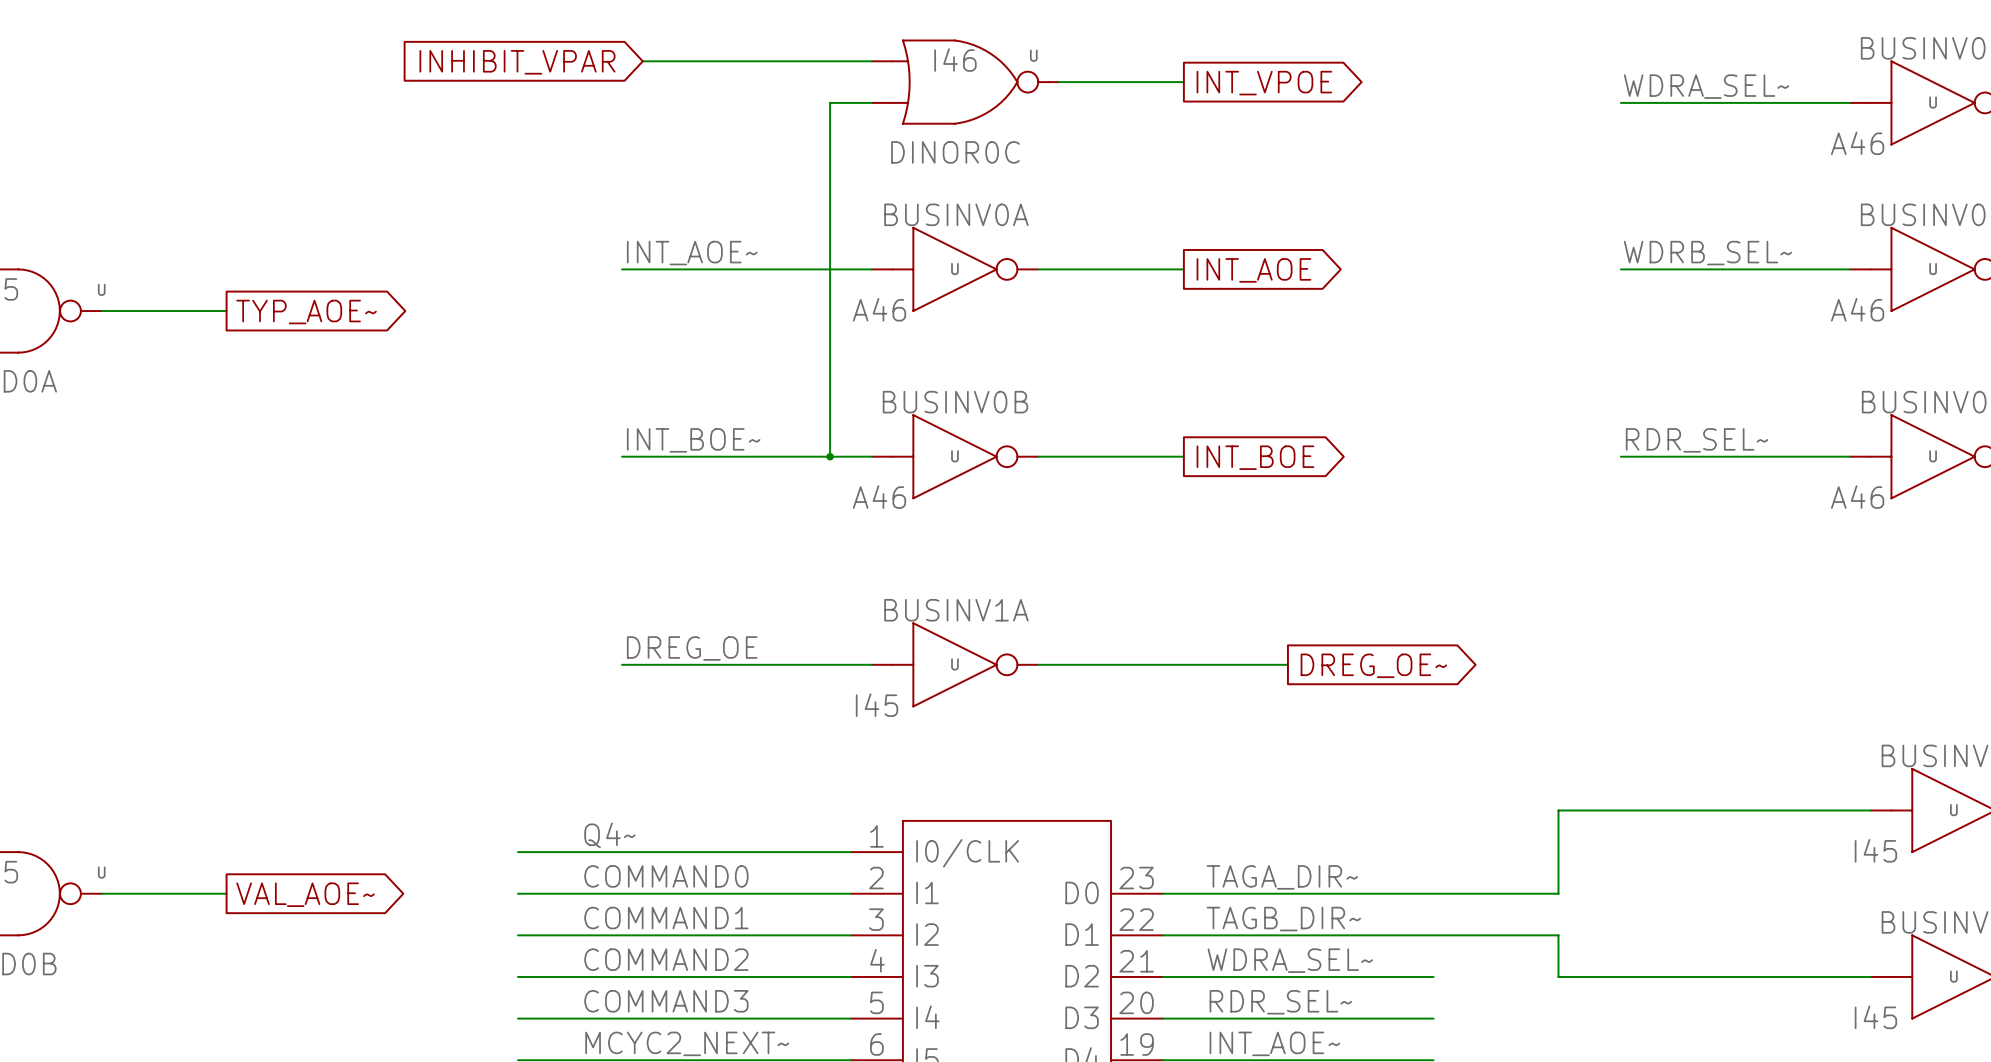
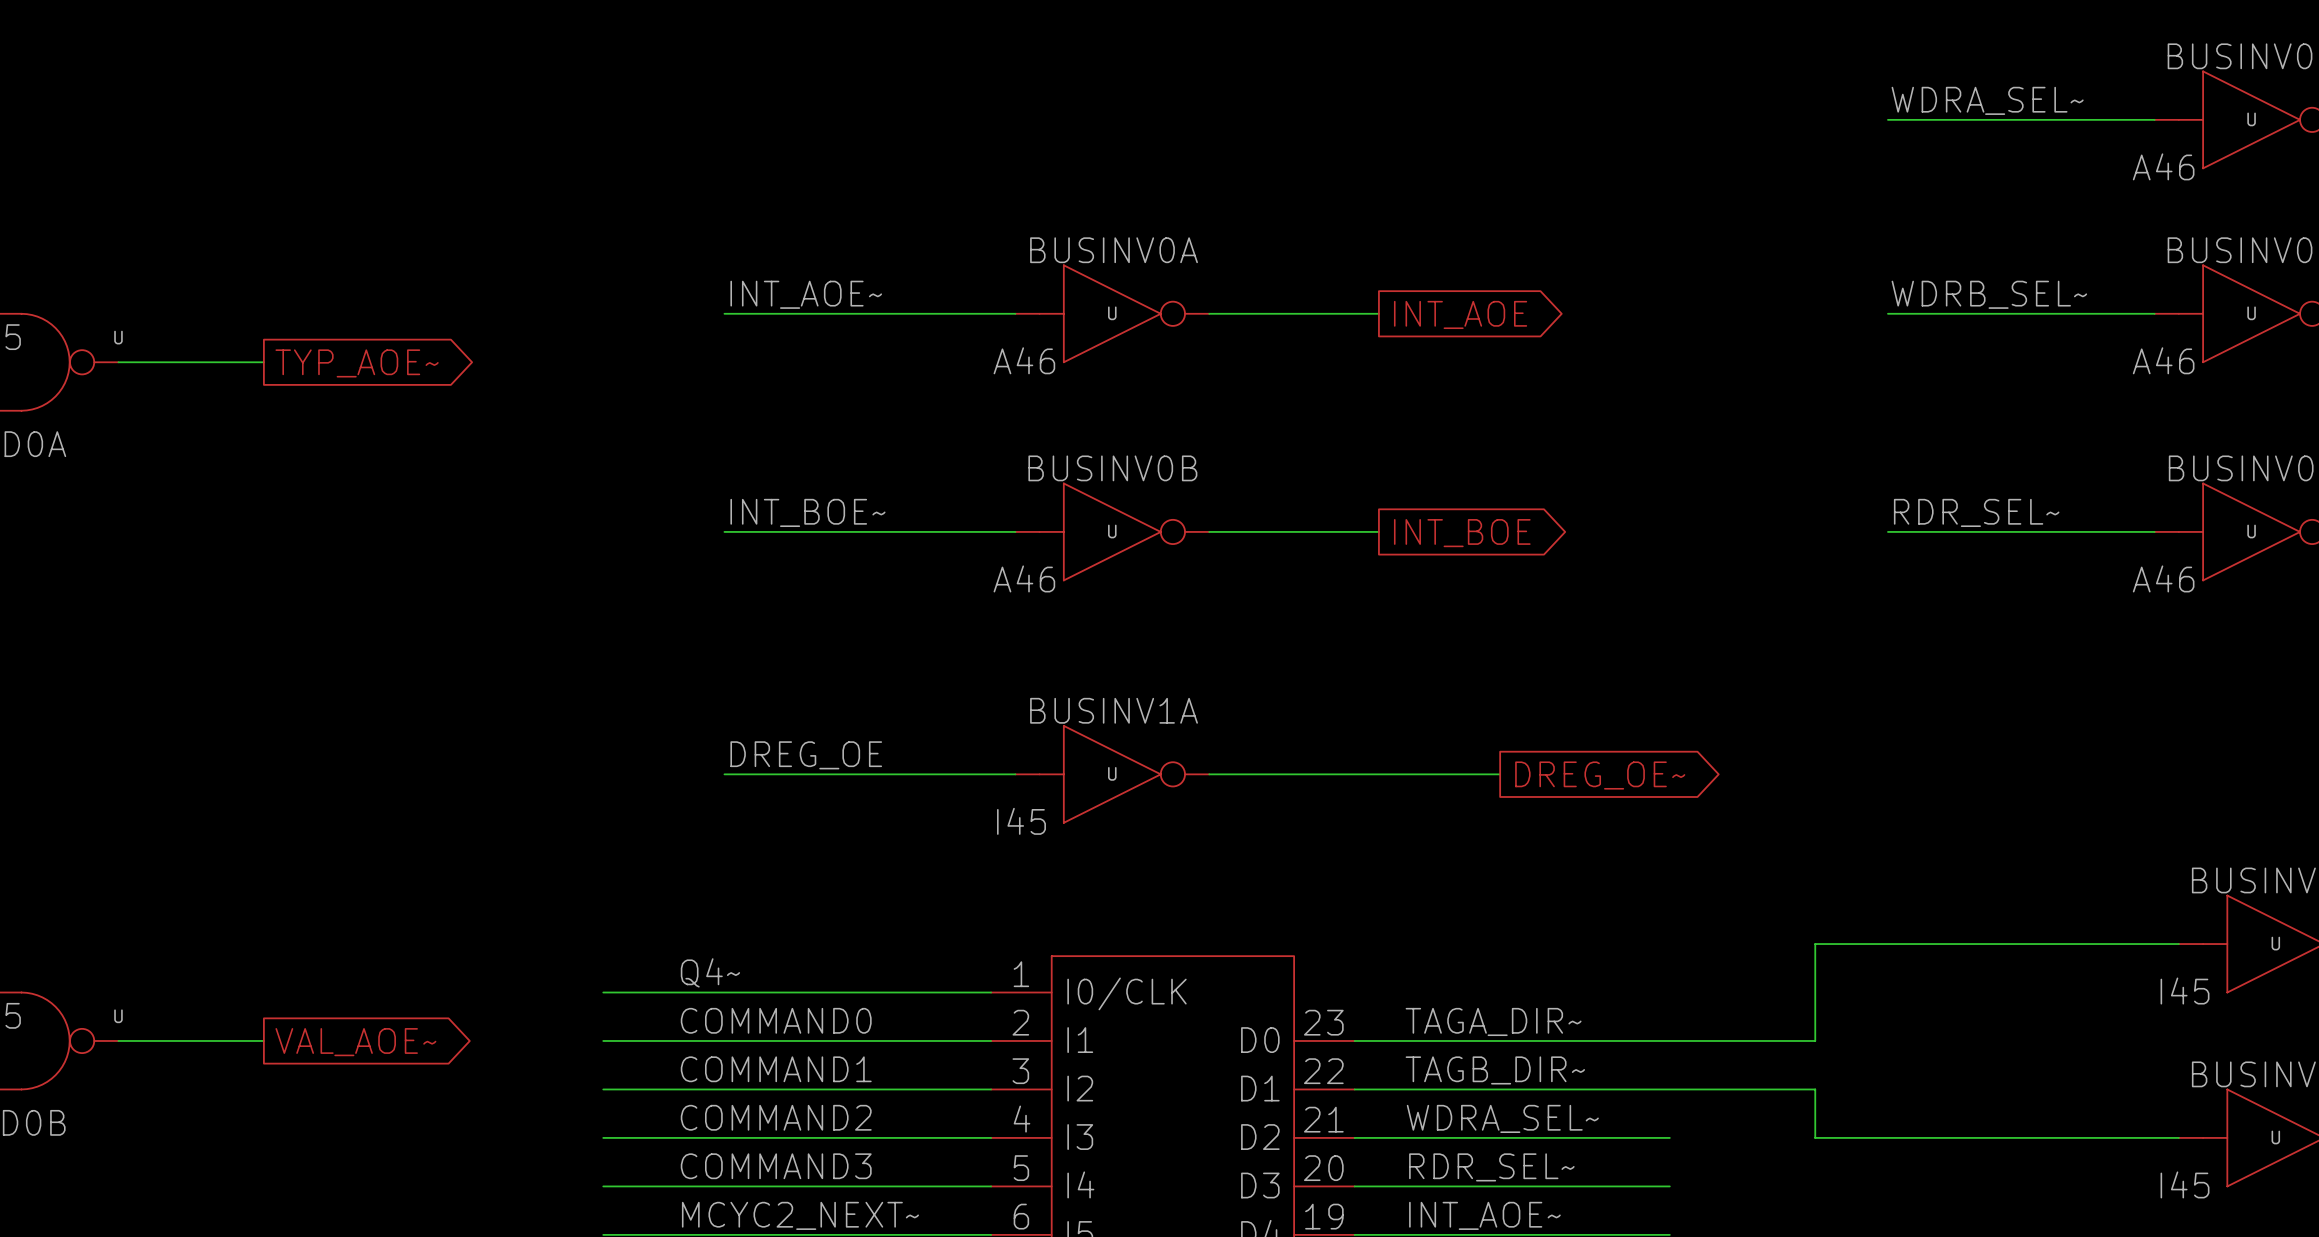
wire: (642, 61) (871, 61) -> none
global label: INHIBIT_VPAR (517, 62) -> none
U: (965, 82) -> none
wire: (1059, 82) (1183, 82) -> none
global label: INT_VPOE (1264, 83) -> none
wire: (871, 102) (830, 102) (830, 456) -> none
junction: (830, 456) -> none

